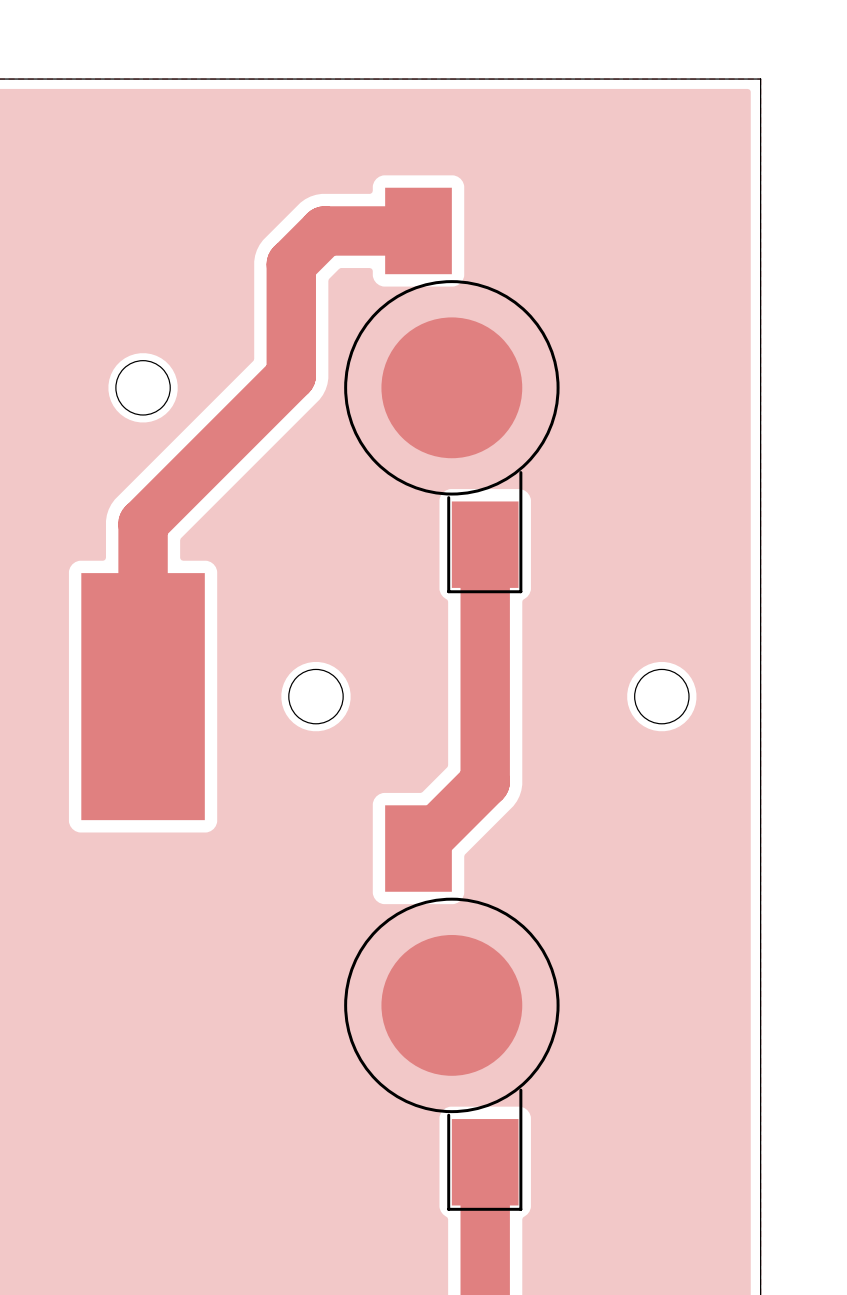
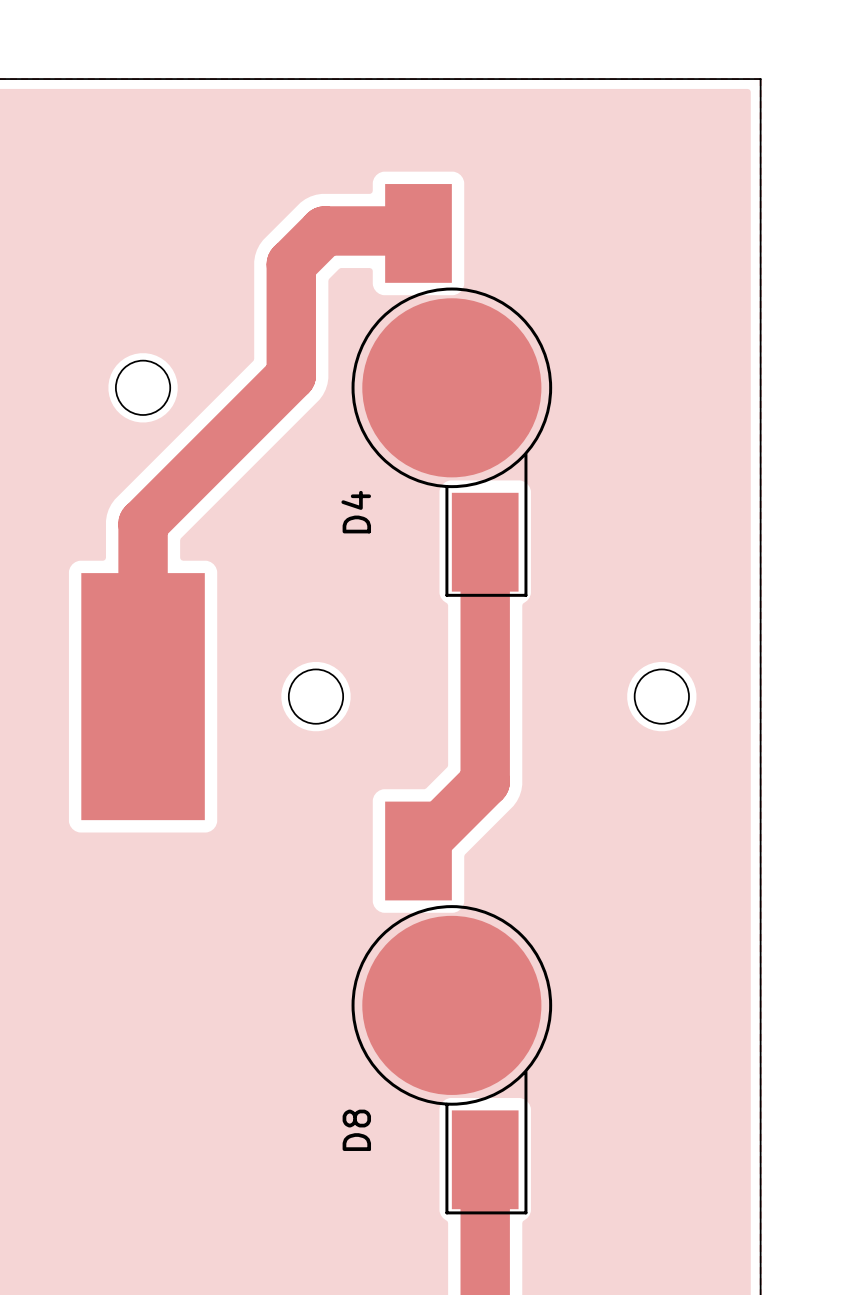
part: (451, 390) -> none
D4: none -> (451, 390)
D8: none -> (451, 1007)
part: (451, 1008) -> none

